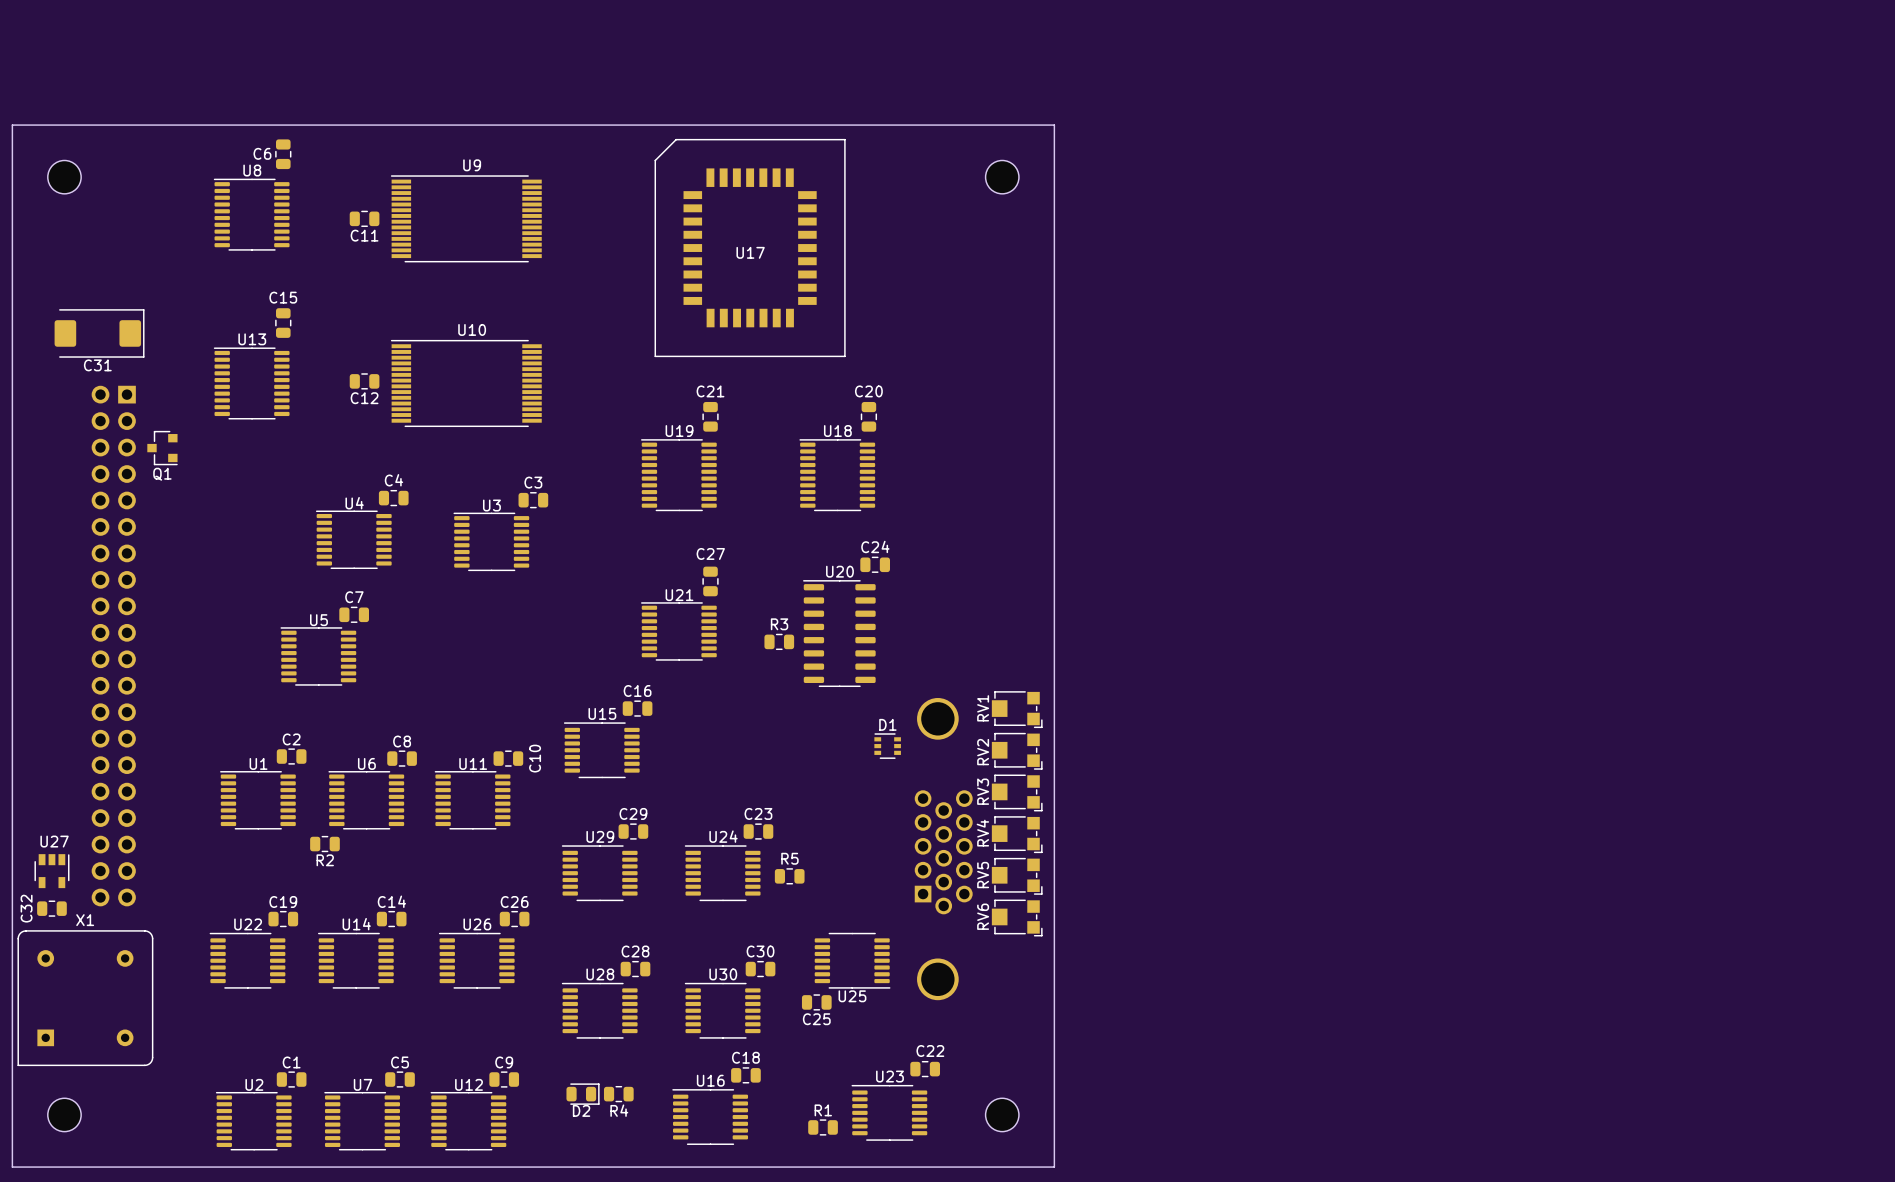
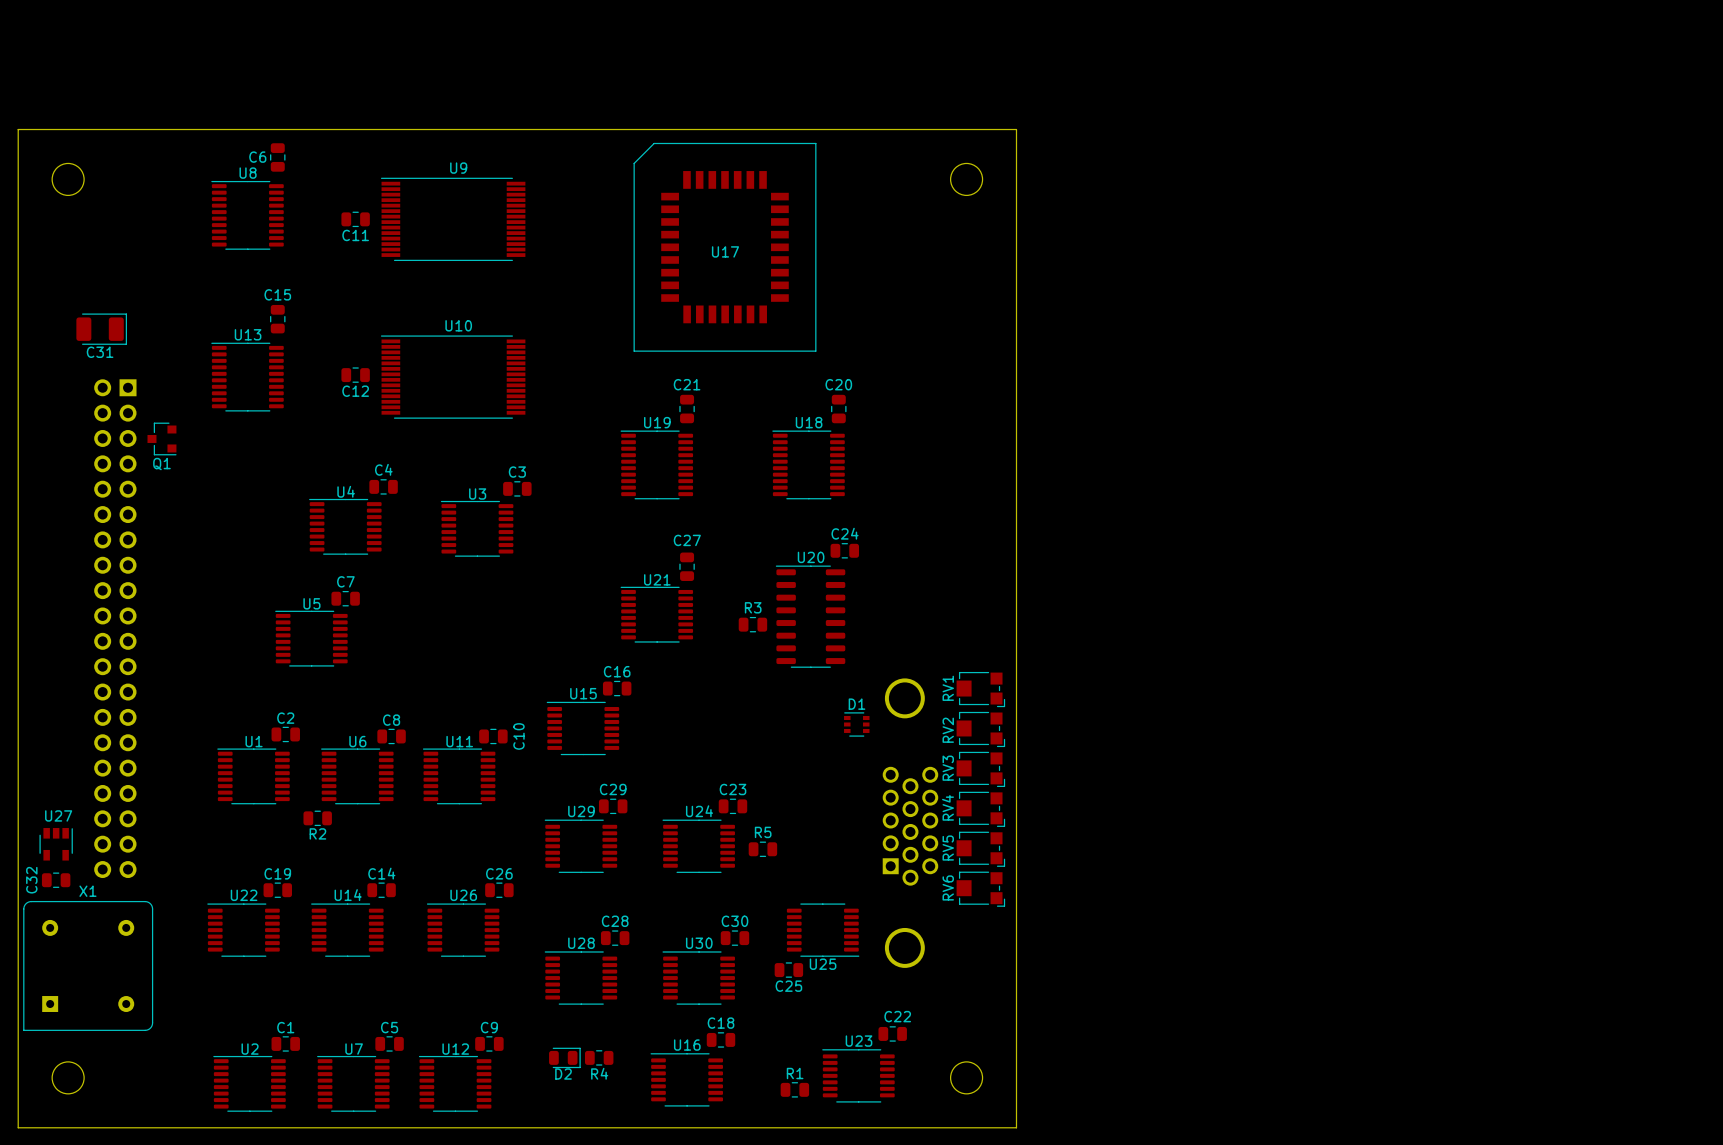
C31 footprint: [54, 309, 145, 358] -> [76, 313, 127, 345]

